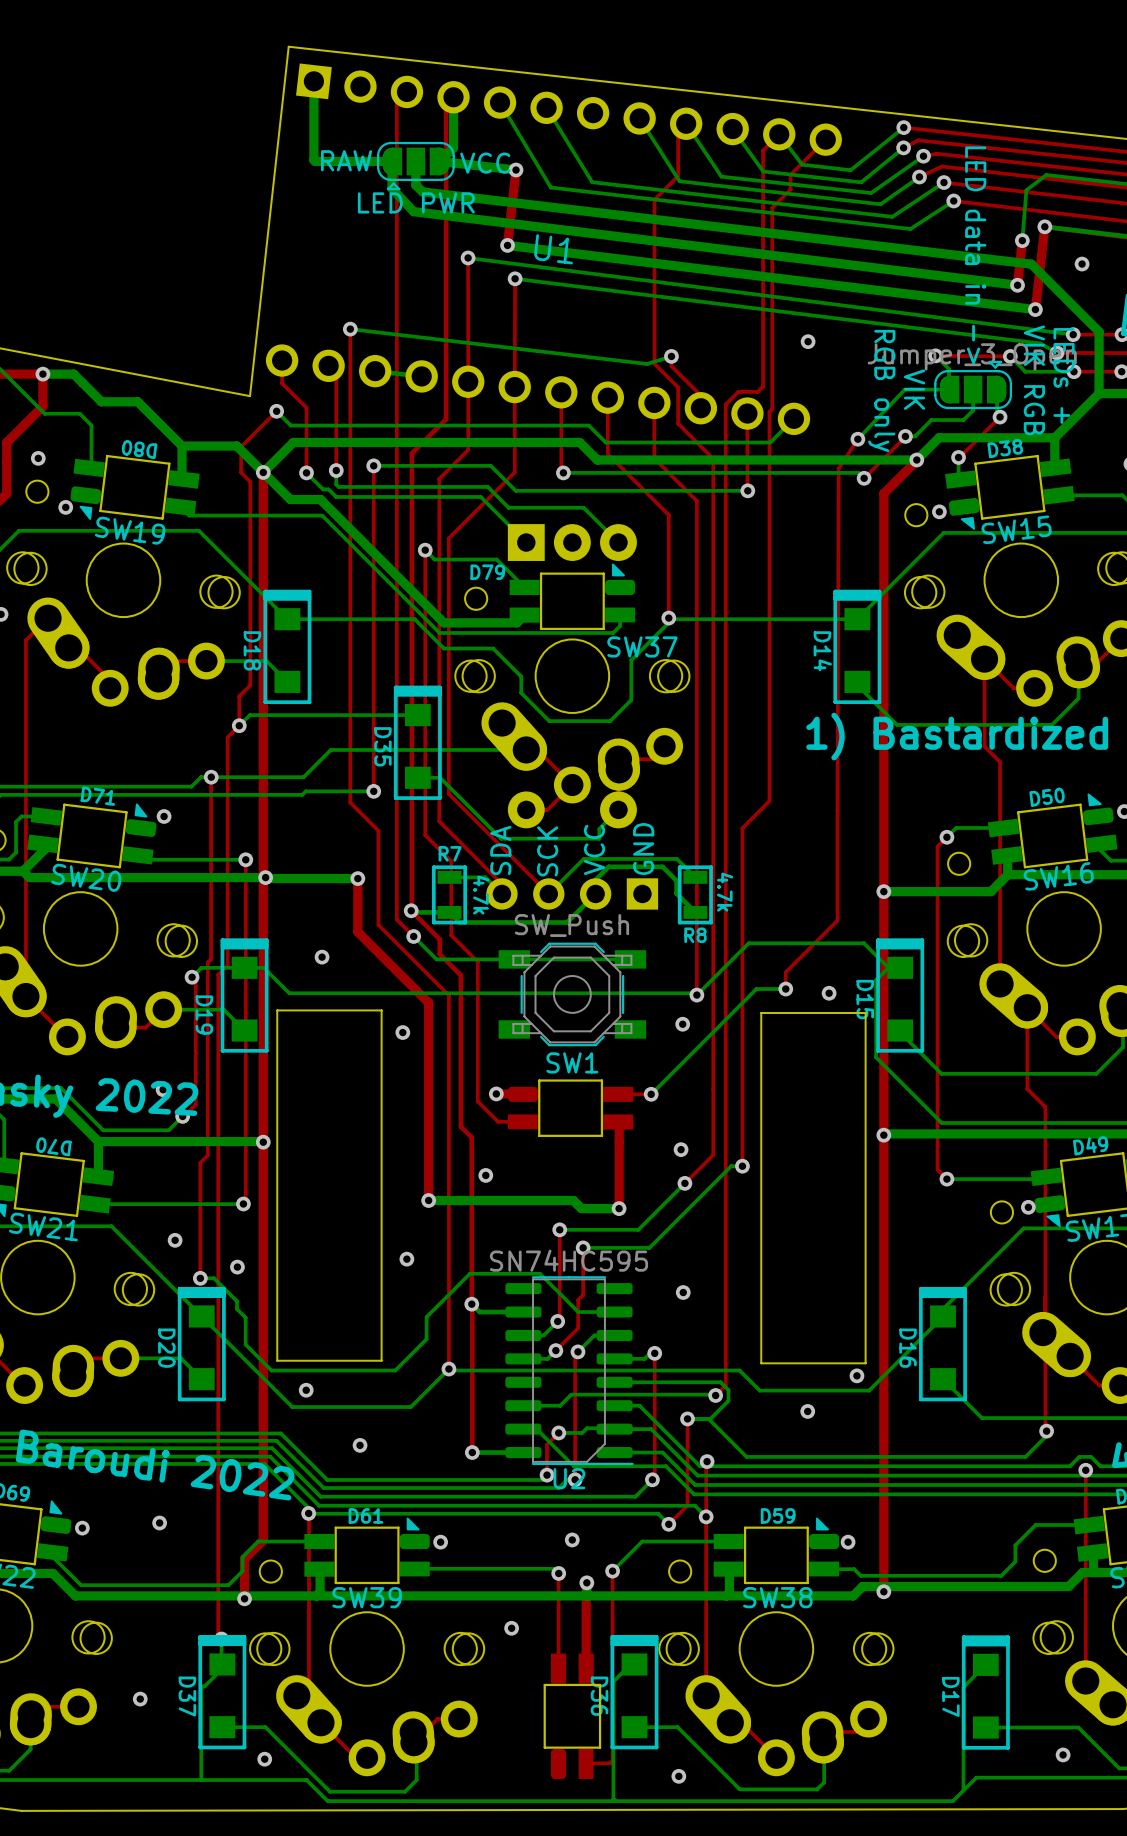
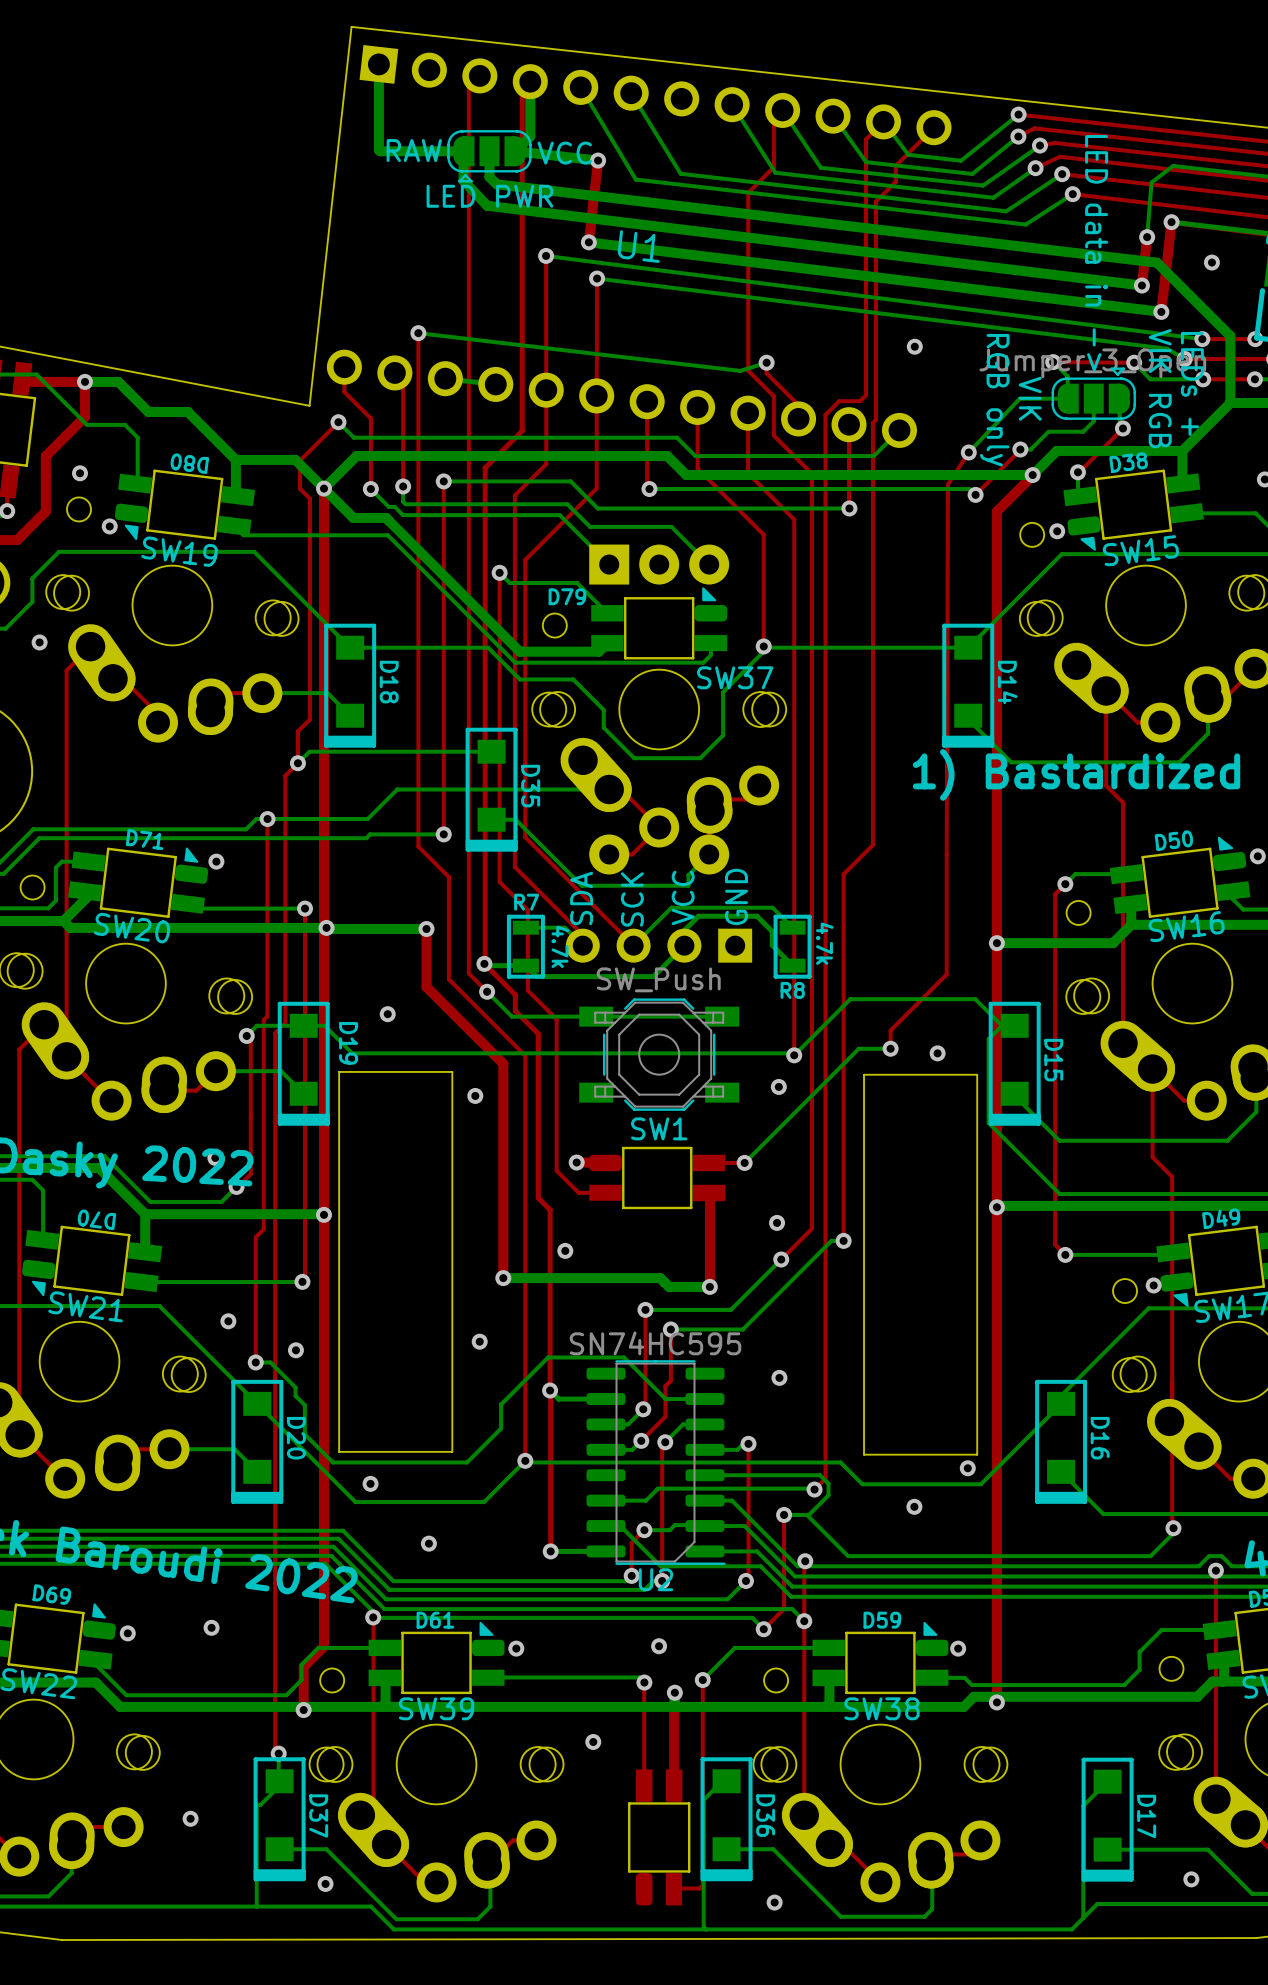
D18 rotation: 0° (287, 646) -> 180° (350, 685)
D14 rotation: 0° (857, 646) -> 180° (968, 685)
D35 rotation: 0° (417, 742) -> 180° (491, 789)
D19 rotation: 0° (244, 995) -> 180° (303, 1063)
D15 rotation: 0° (900, 995) -> 180° (1014, 1063)
D20 rotation: 0° (201, 1344) -> 180° (257, 1441)
D16 rotation: 0° (942, 1344) -> 180° (1061, 1441)
D37 rotation: 0° (222, 1692) -> 180° (279, 1819)
D36 rotation: 0° (634, 1692) -> 180° (726, 1819)
D17 rotation: 0° (985, 1692) -> 180° (1107, 1819)

